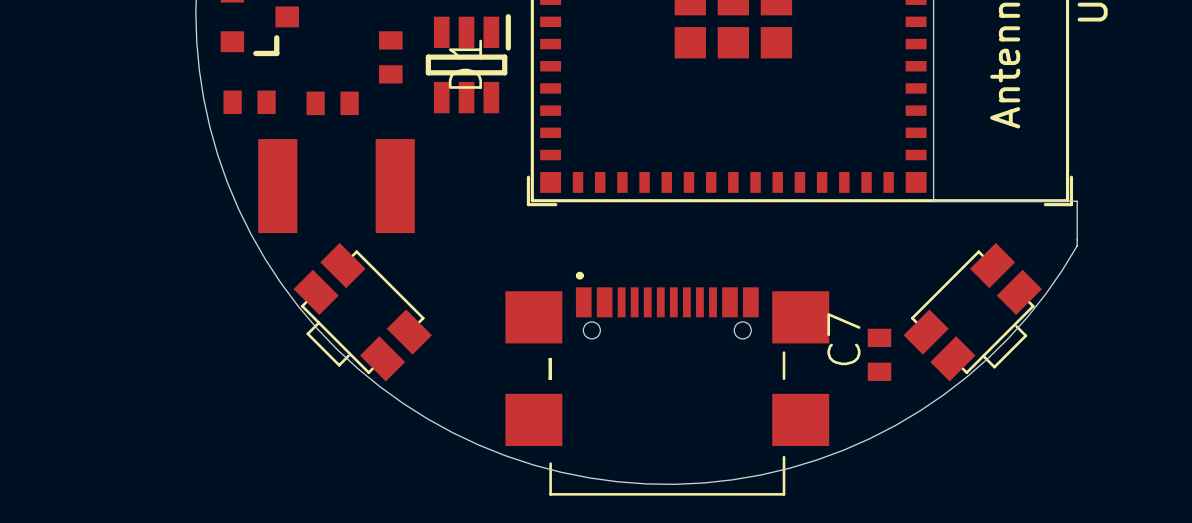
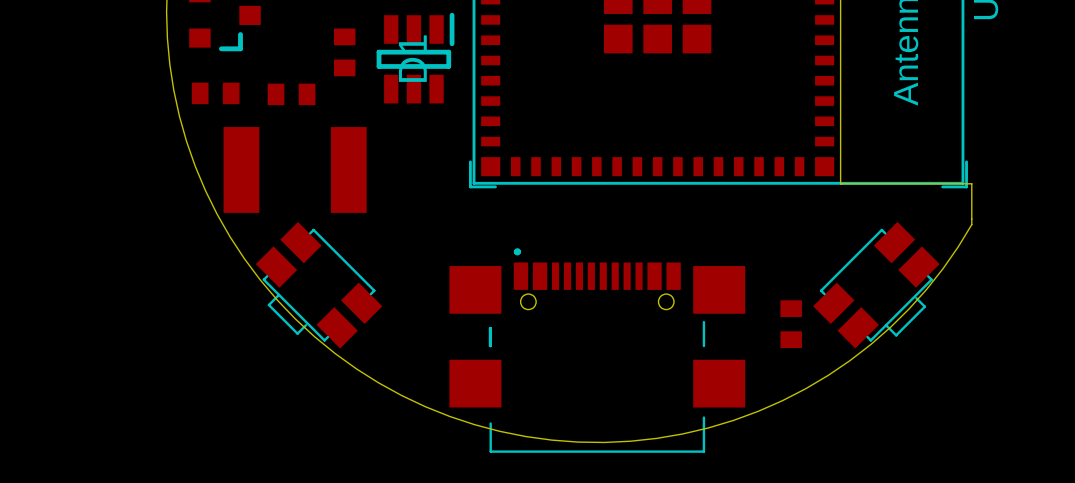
C7 name: C7 (843, 339) -> none

